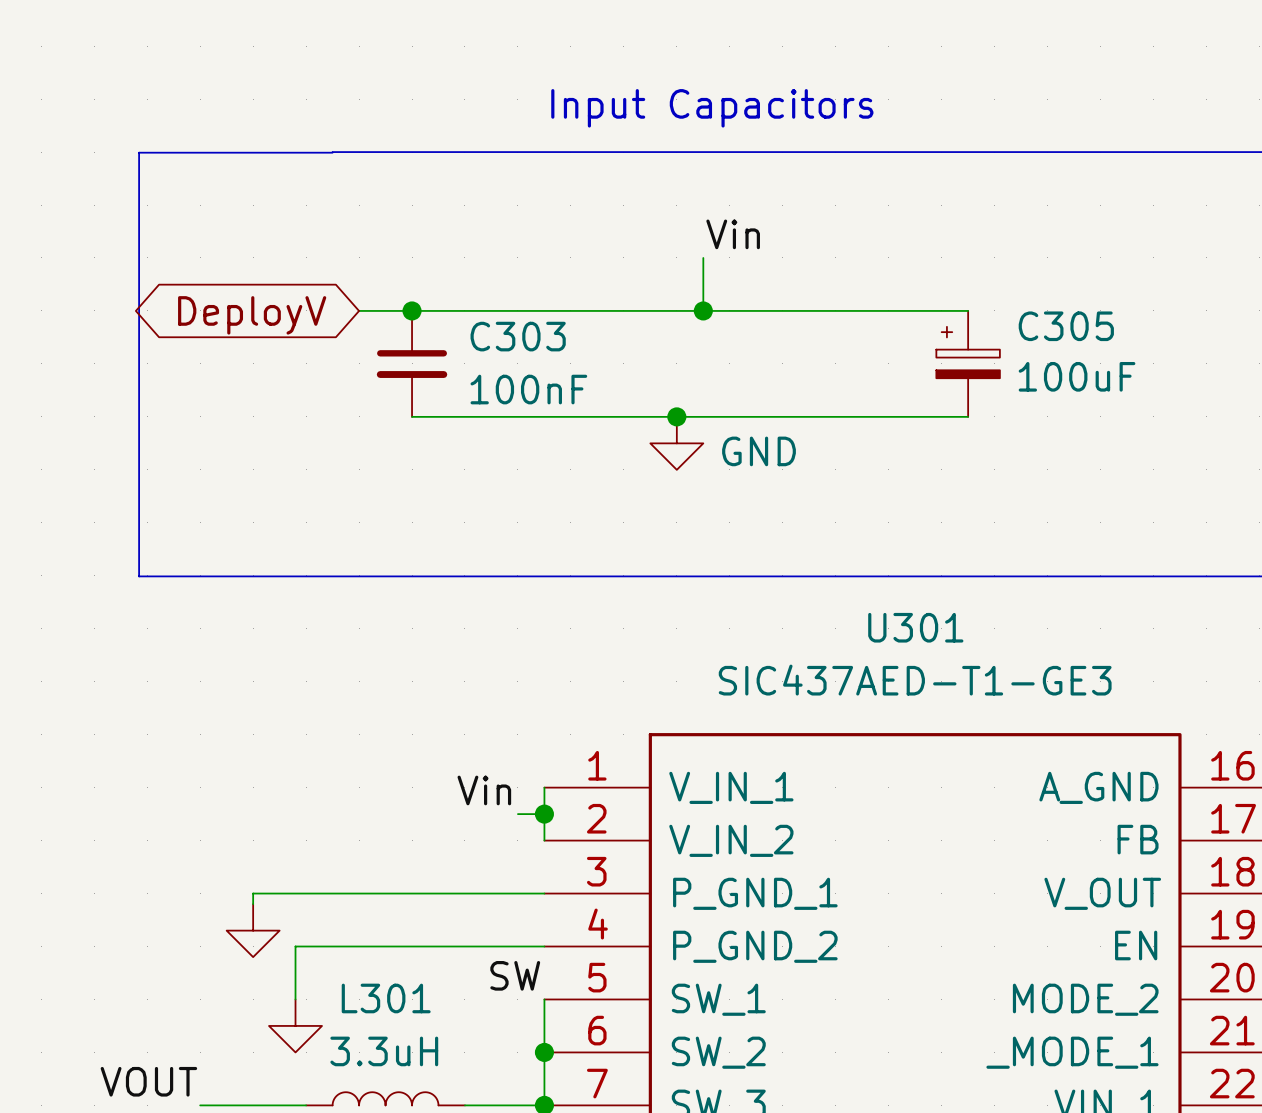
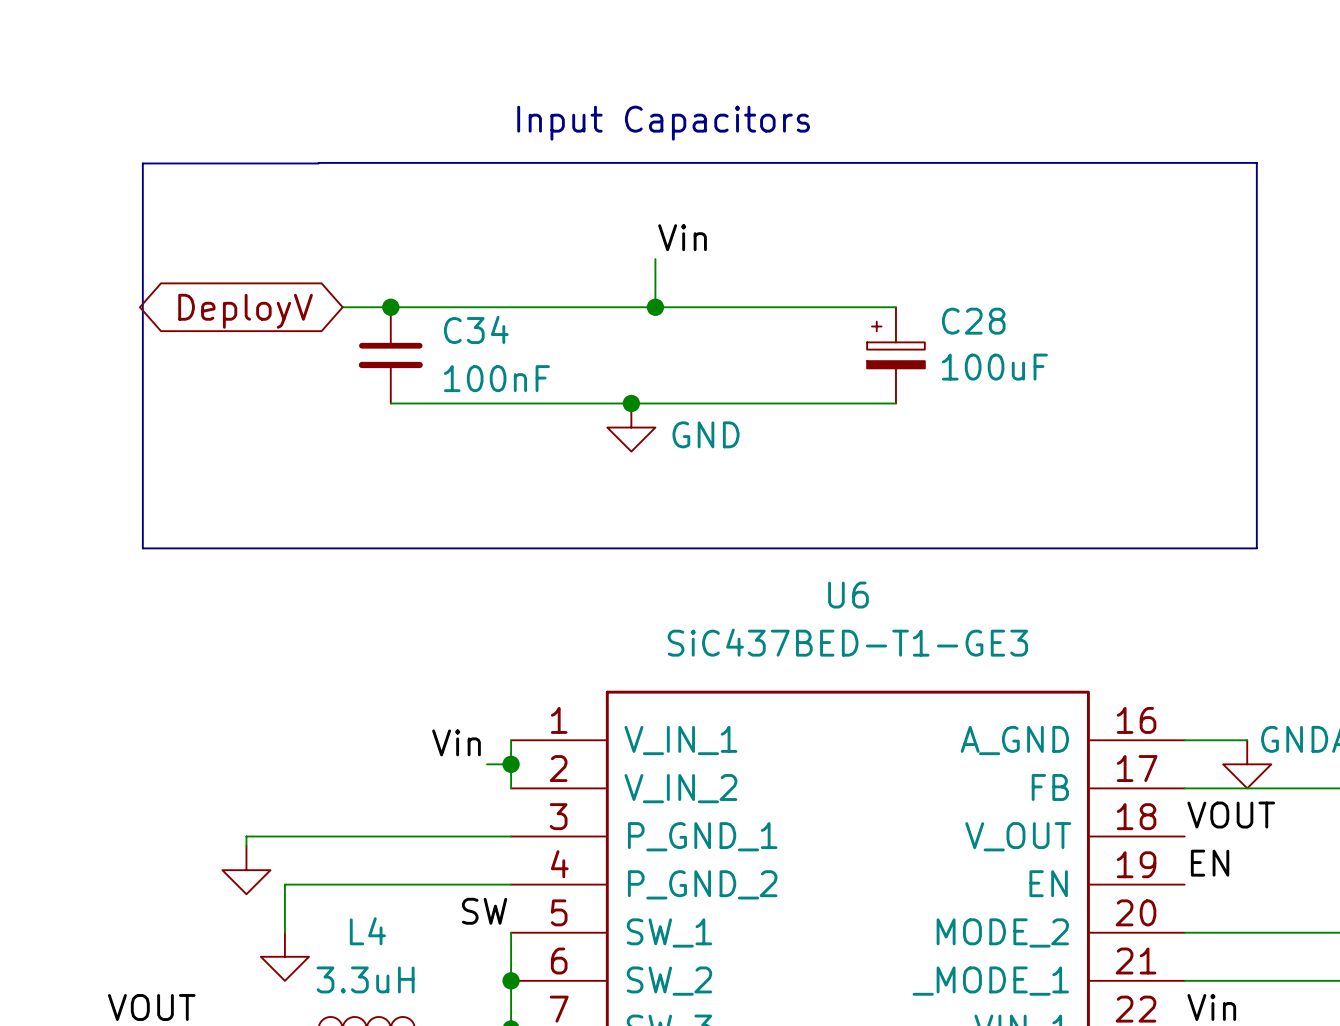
C305 name: C305 (1066, 326) -> C28 (973, 321)
C303 name: C303 (518, 336) -> C34 (476, 329)
U301 name: U301 (915, 627) -> U6 (848, 595)
U301 value: SIC437AED-T1-GE3 (915, 680) -> SiC437BED-T1-GE3 (847, 642)
L301 name: L301 (386, 998) -> L4 (367, 931)

